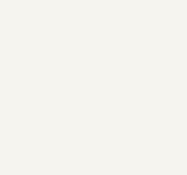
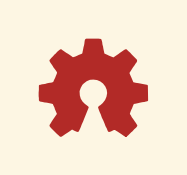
power symbol: none -> (93, 87)

